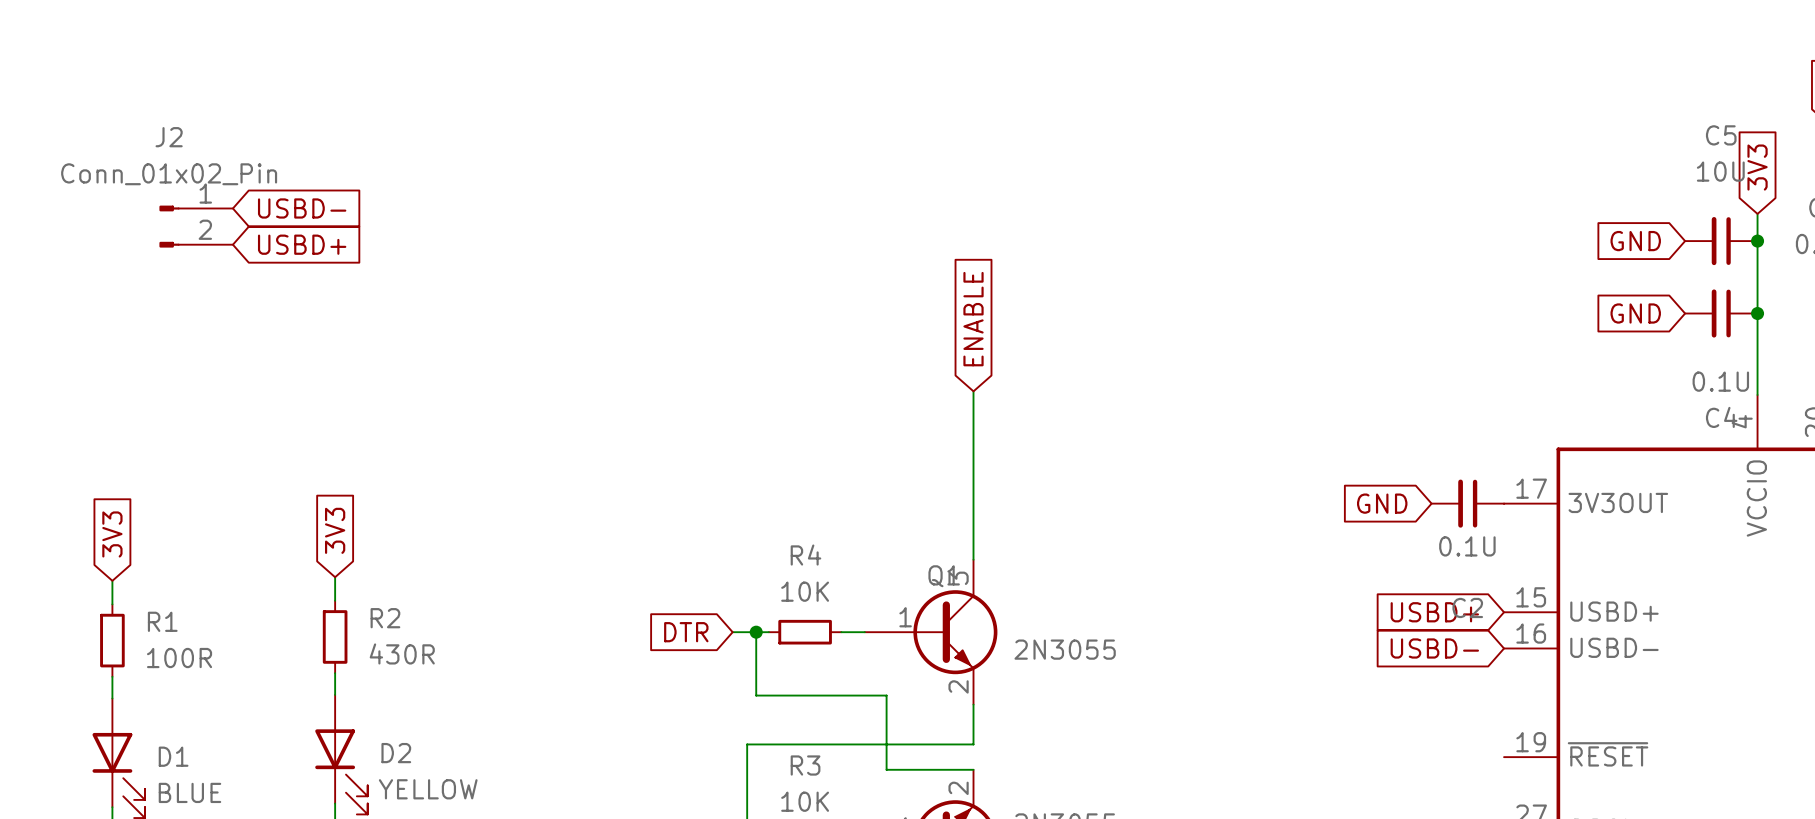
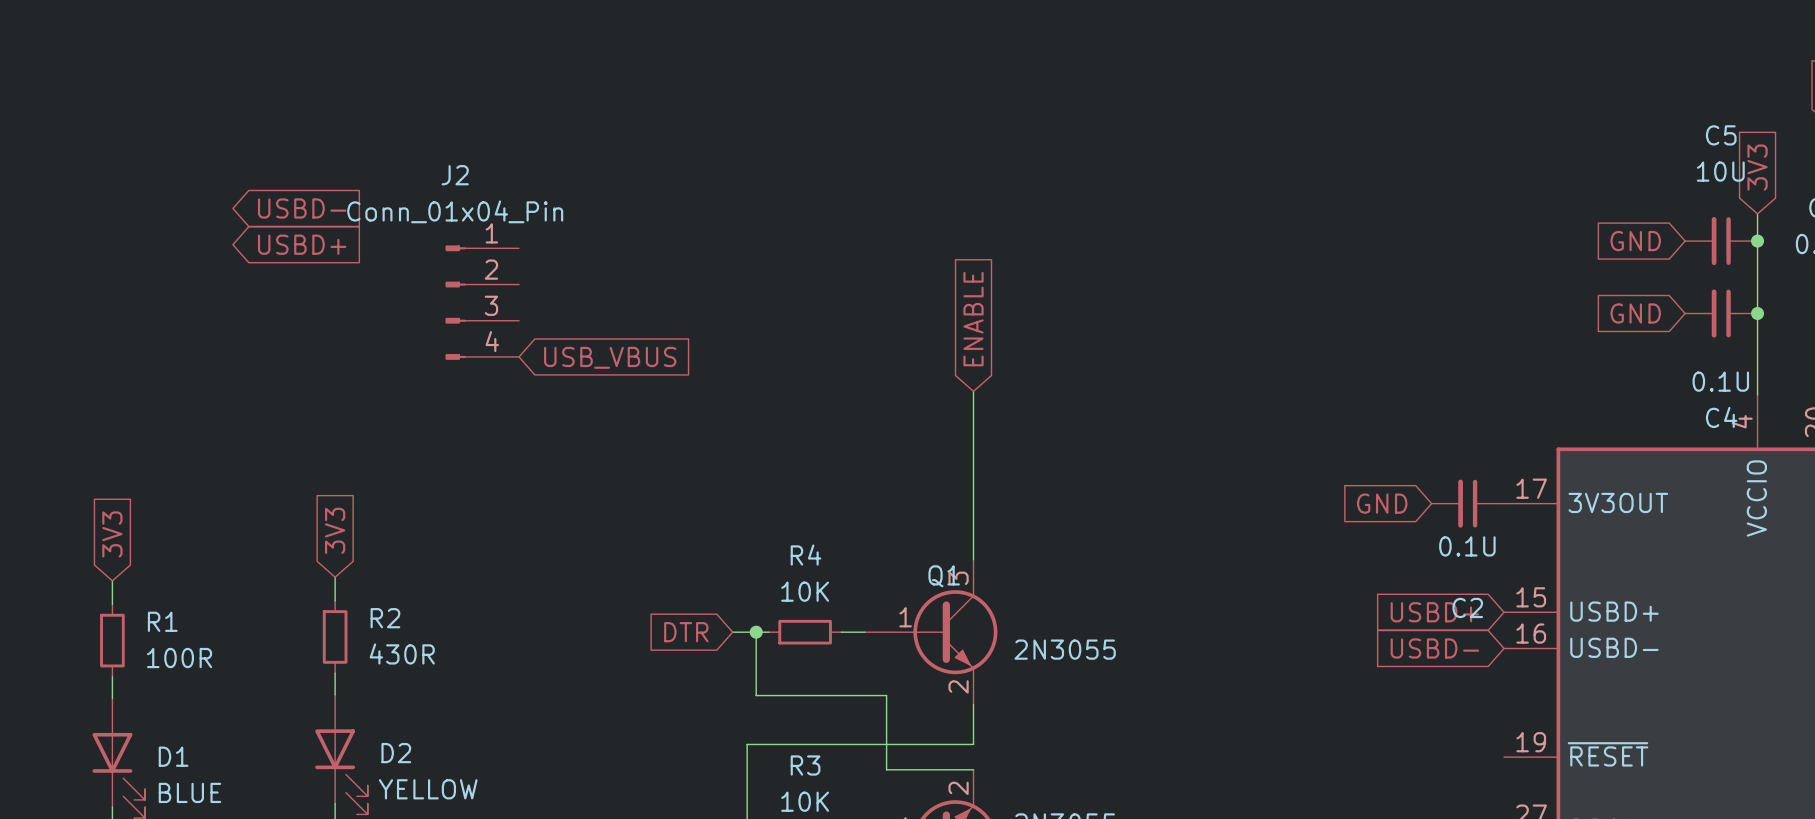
J2 name position: J2 (169, 137) -> J2 (455, 175)
J2 value: Conn_01x02_Pin (169, 174) -> Conn_01x04_Pin (455, 211)
J2 symbol: [159, 205, 233, 248] -> [445, 245, 520, 360]
global label: none -> USB_VBUS (610, 357)

